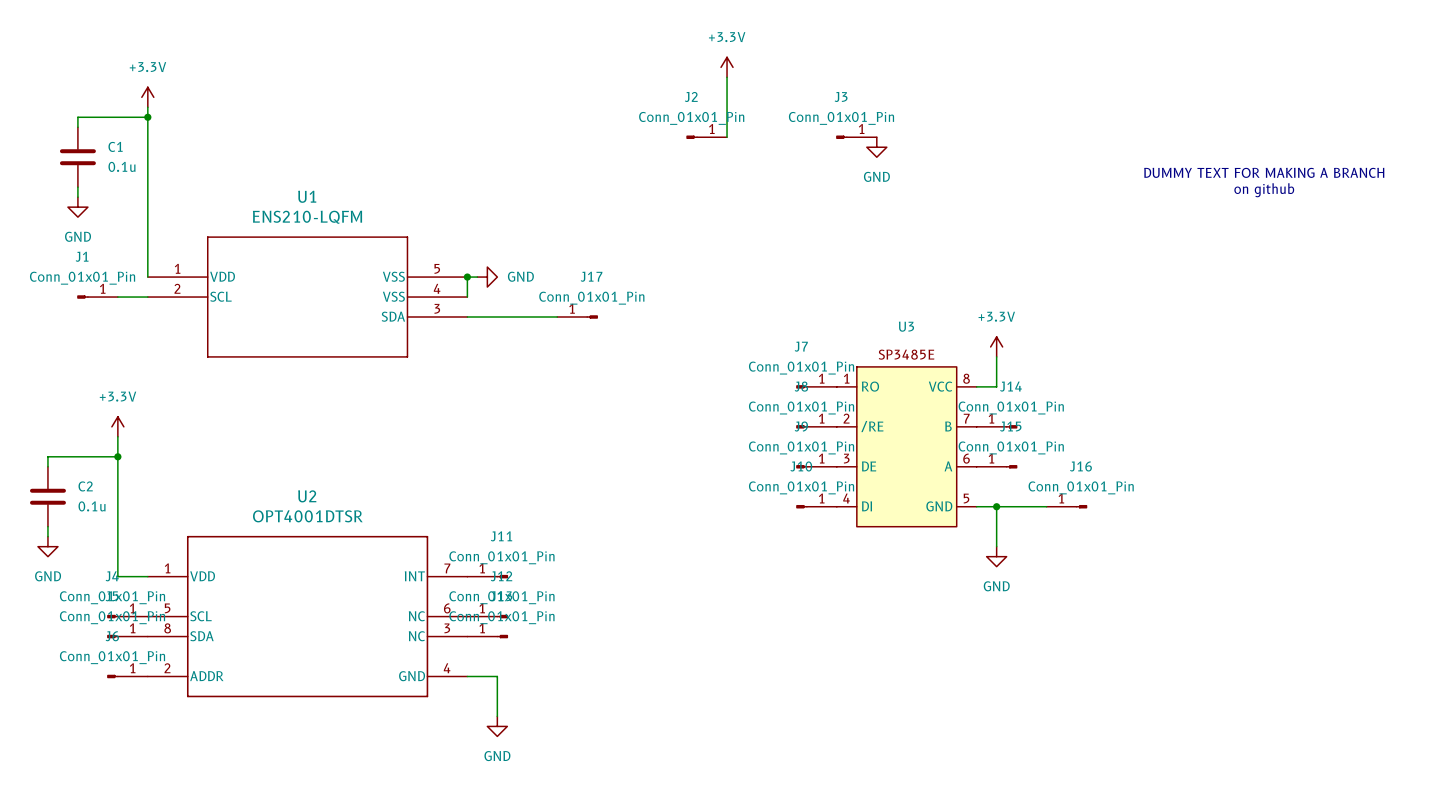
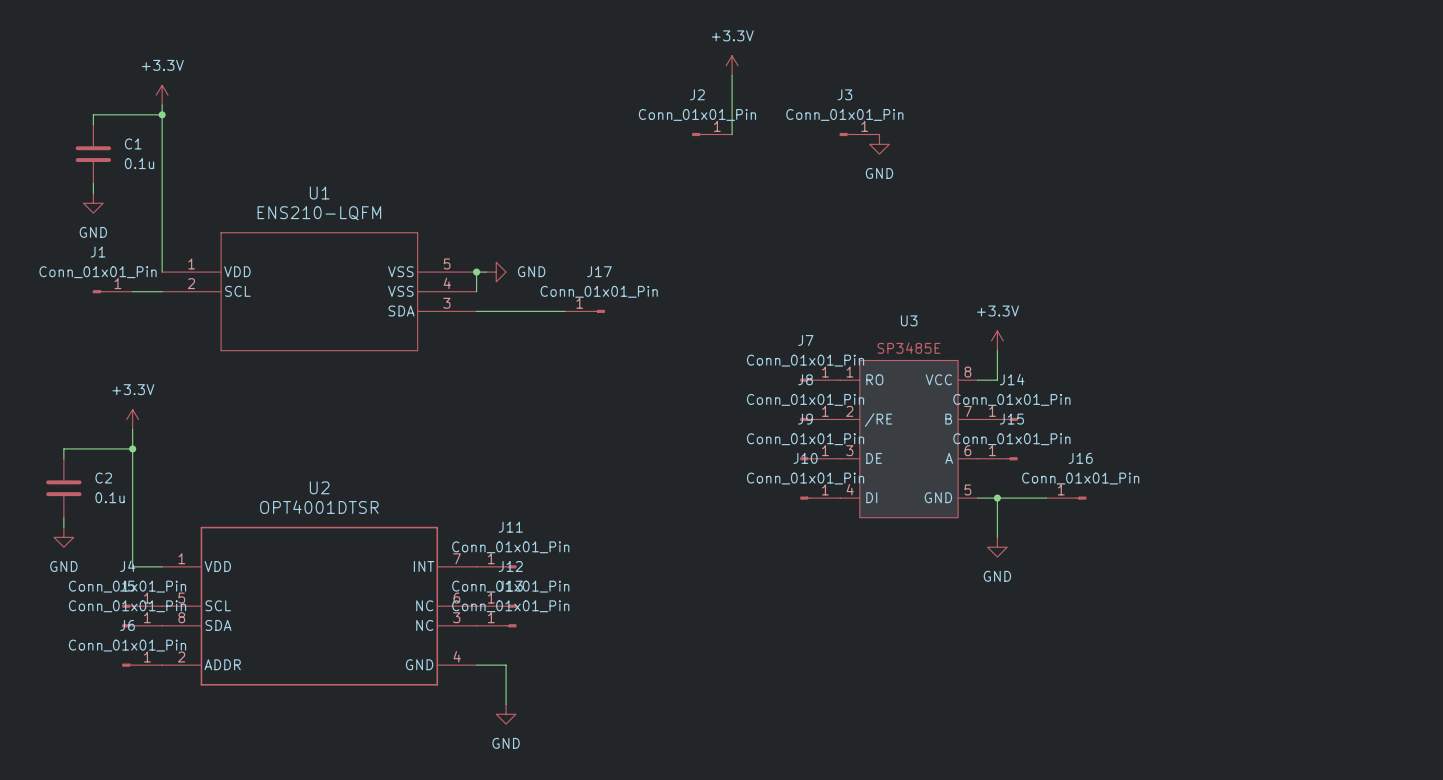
text: DUMMY TEXT FOR MAKING A BRANCH (1264, 172) -> none
text: on github (1264, 190) -> none

